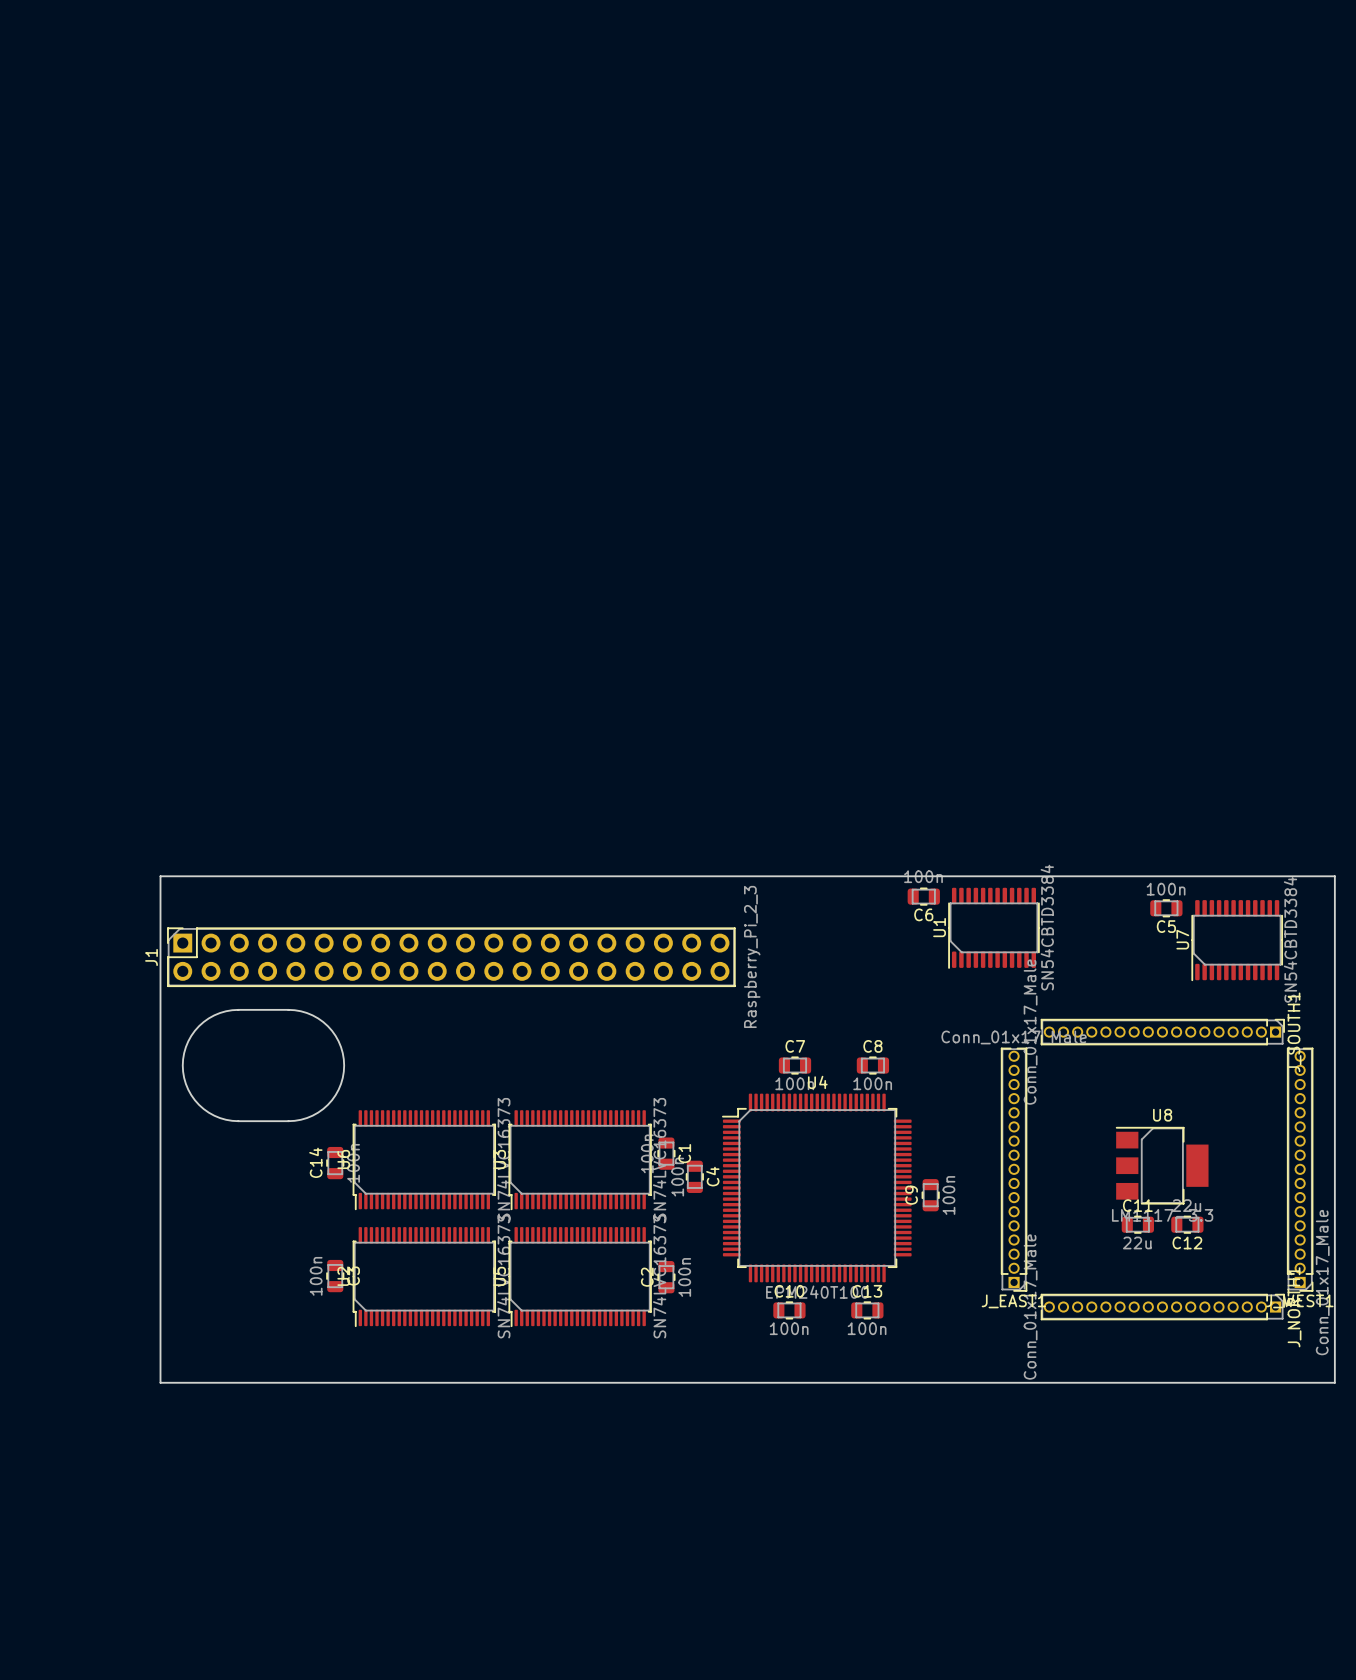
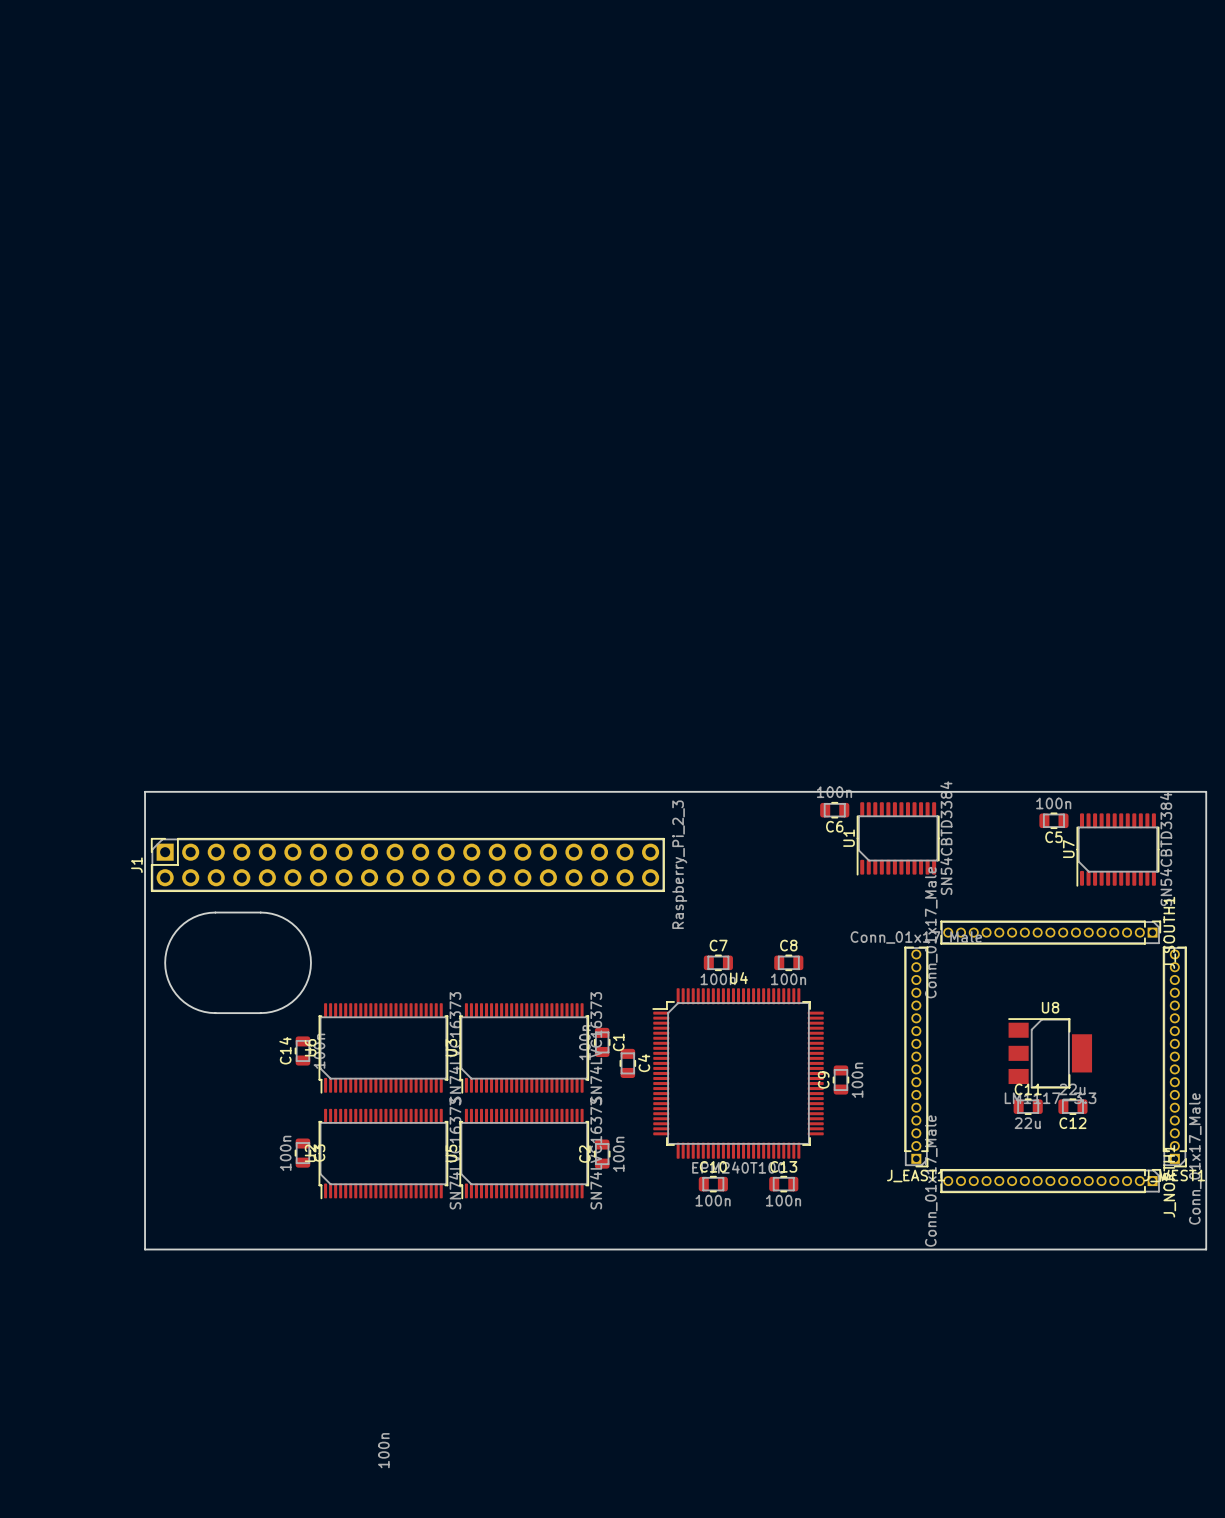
C4 value position: 100n (677, 1177) -> 100n (383, 1450)

